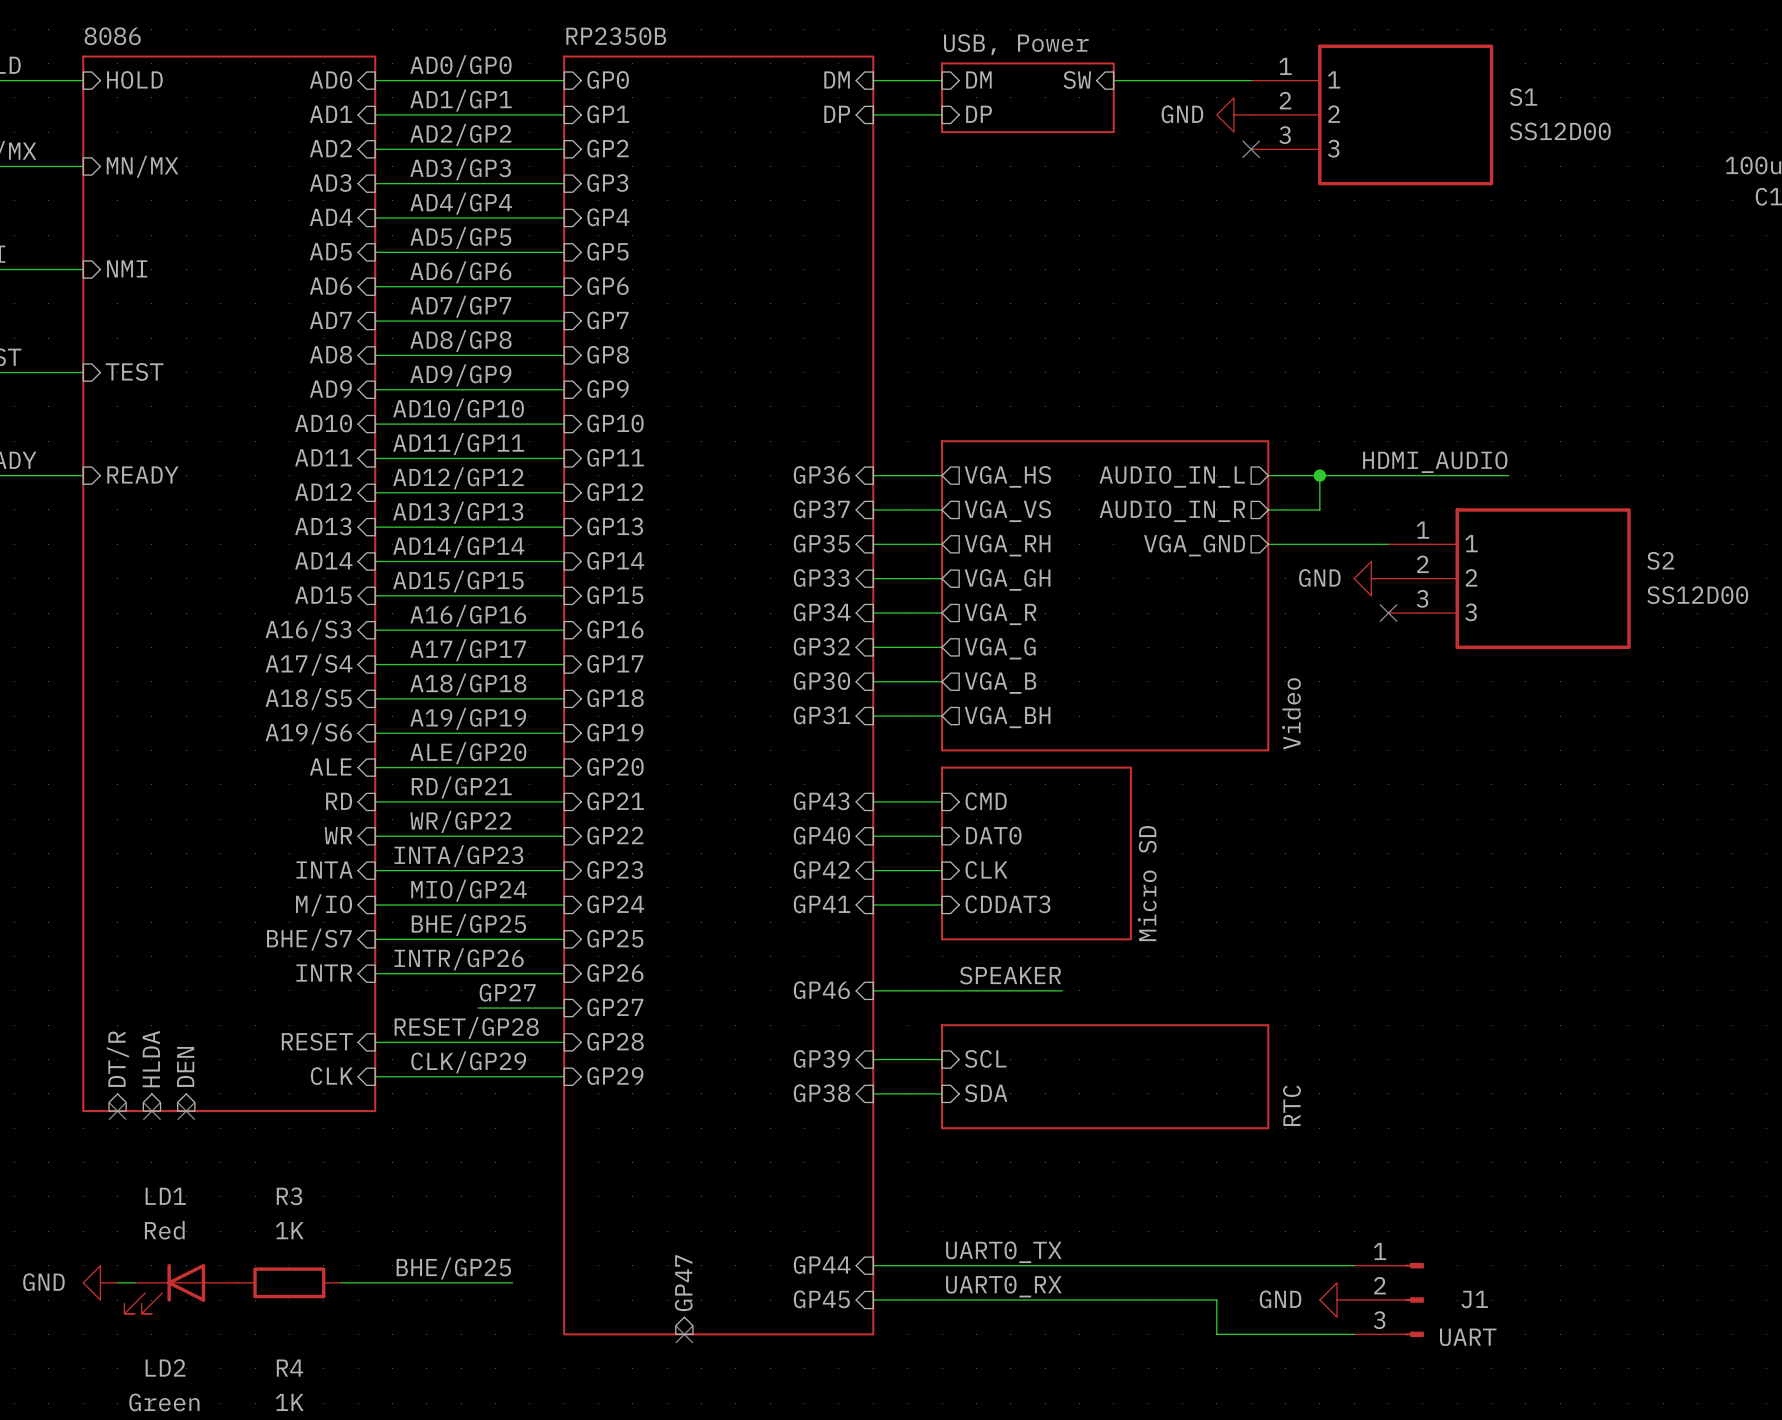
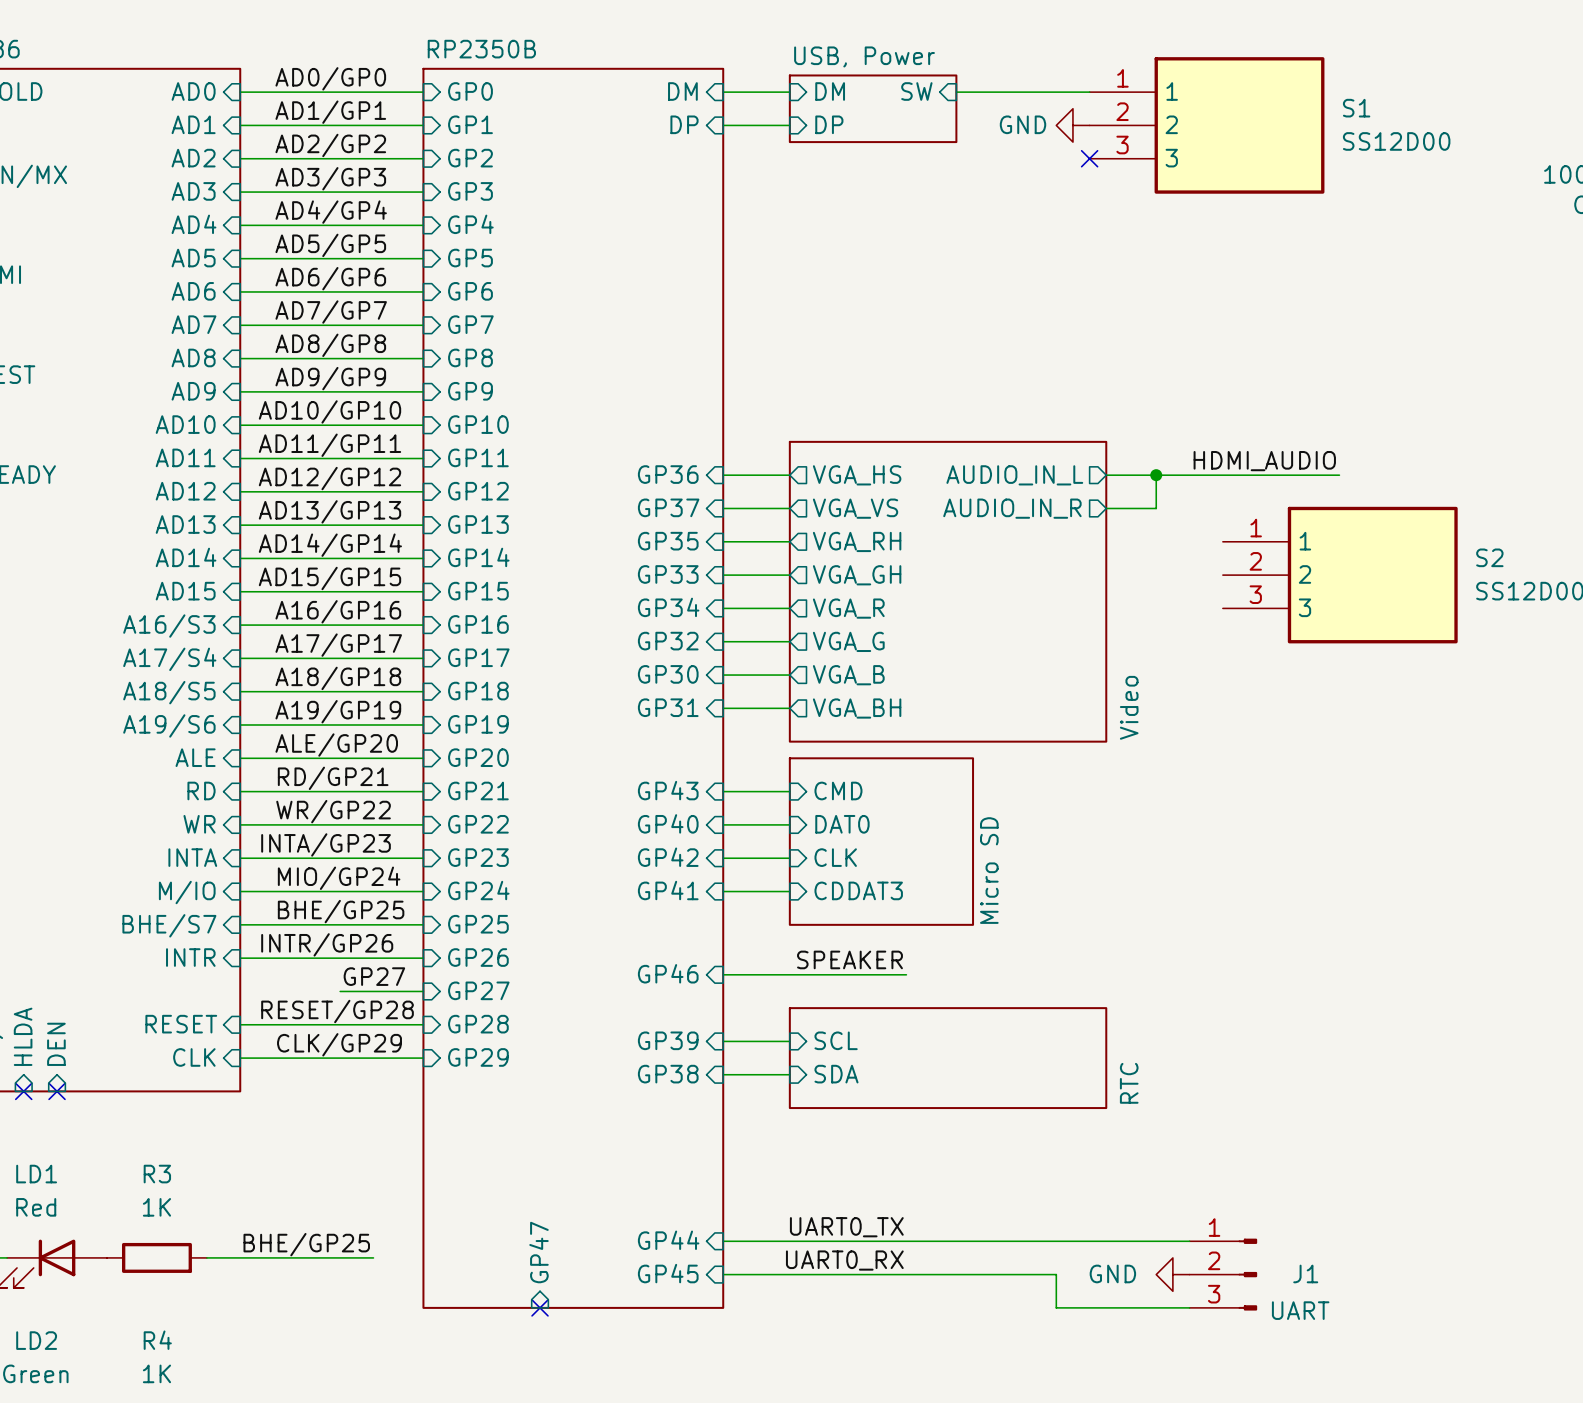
wire: (1268, 544) (1388, 544) -> none
sheet pin: VGA_GND (1194, 545) -> none
power symbol: GND (1371, 578) -> none
no-connect mark: (1388, 613) -> none

